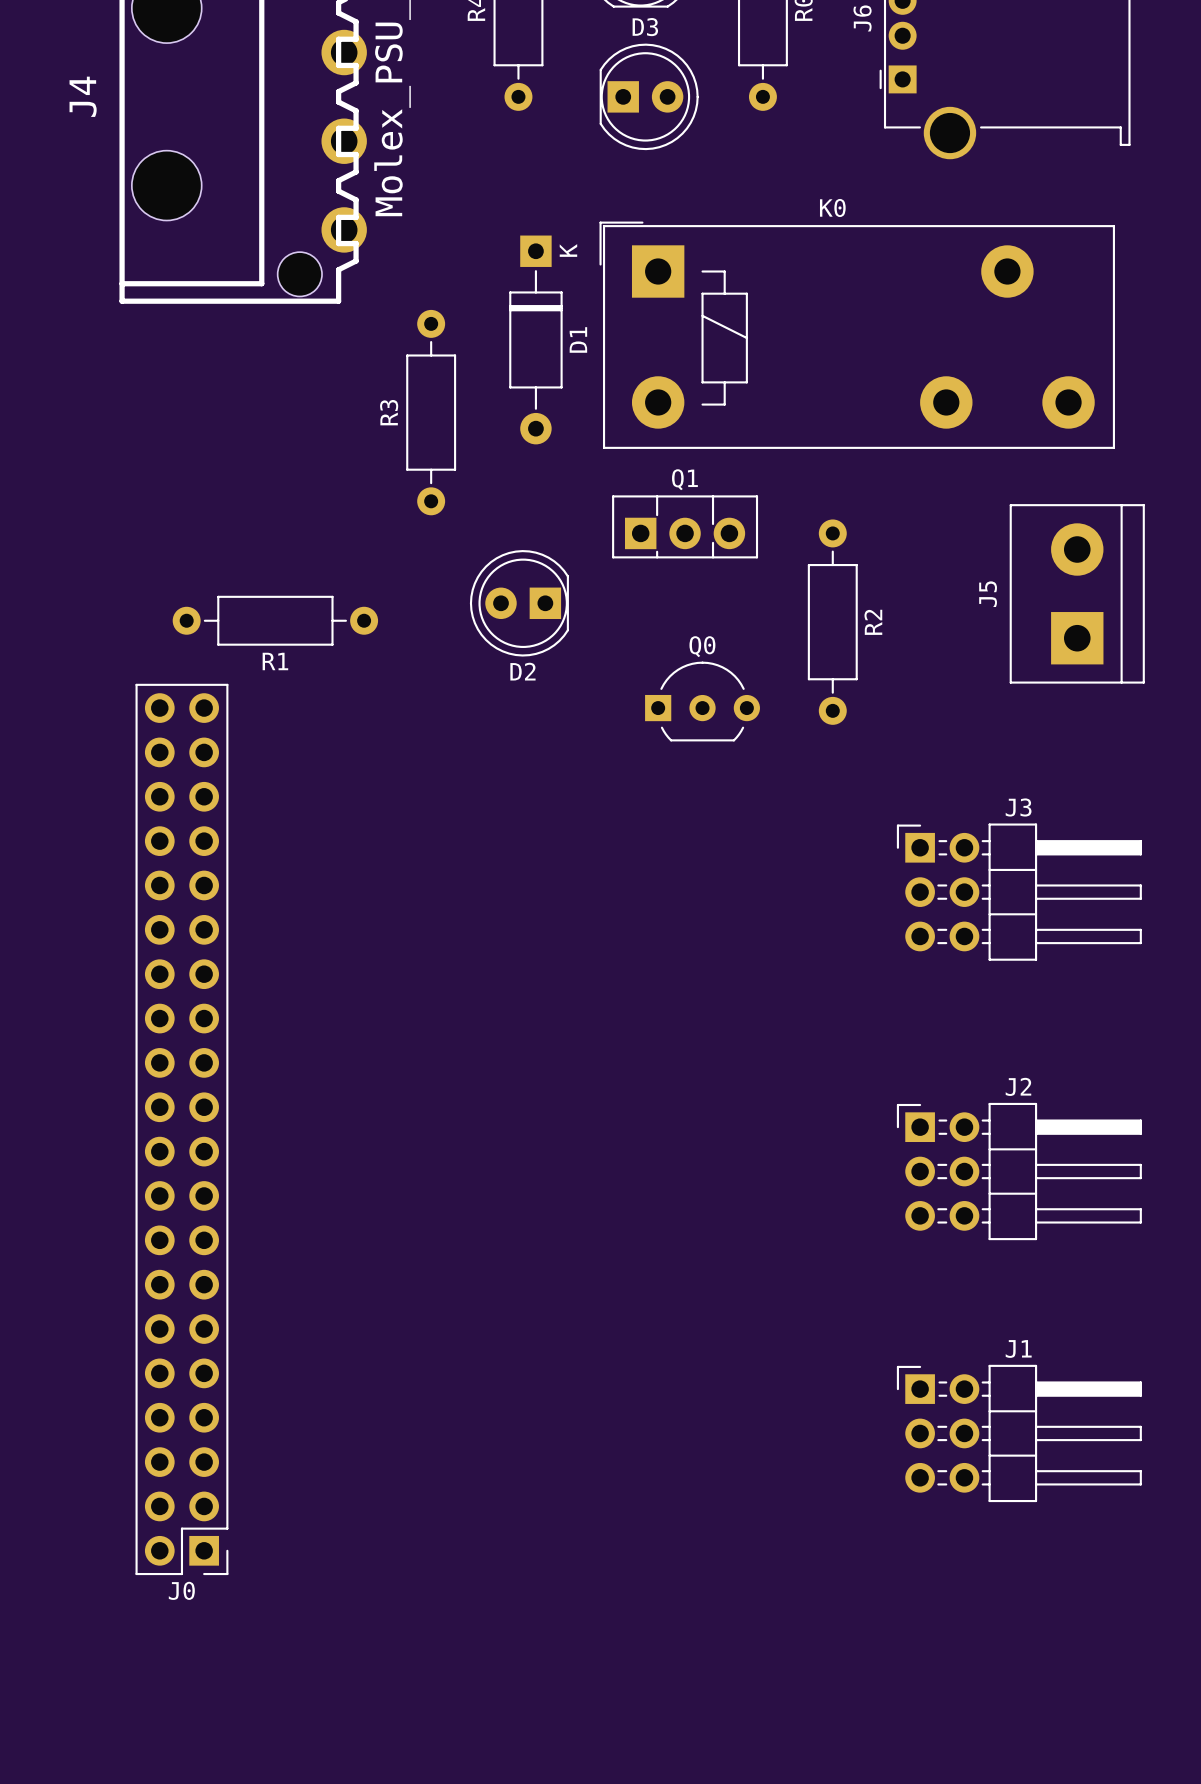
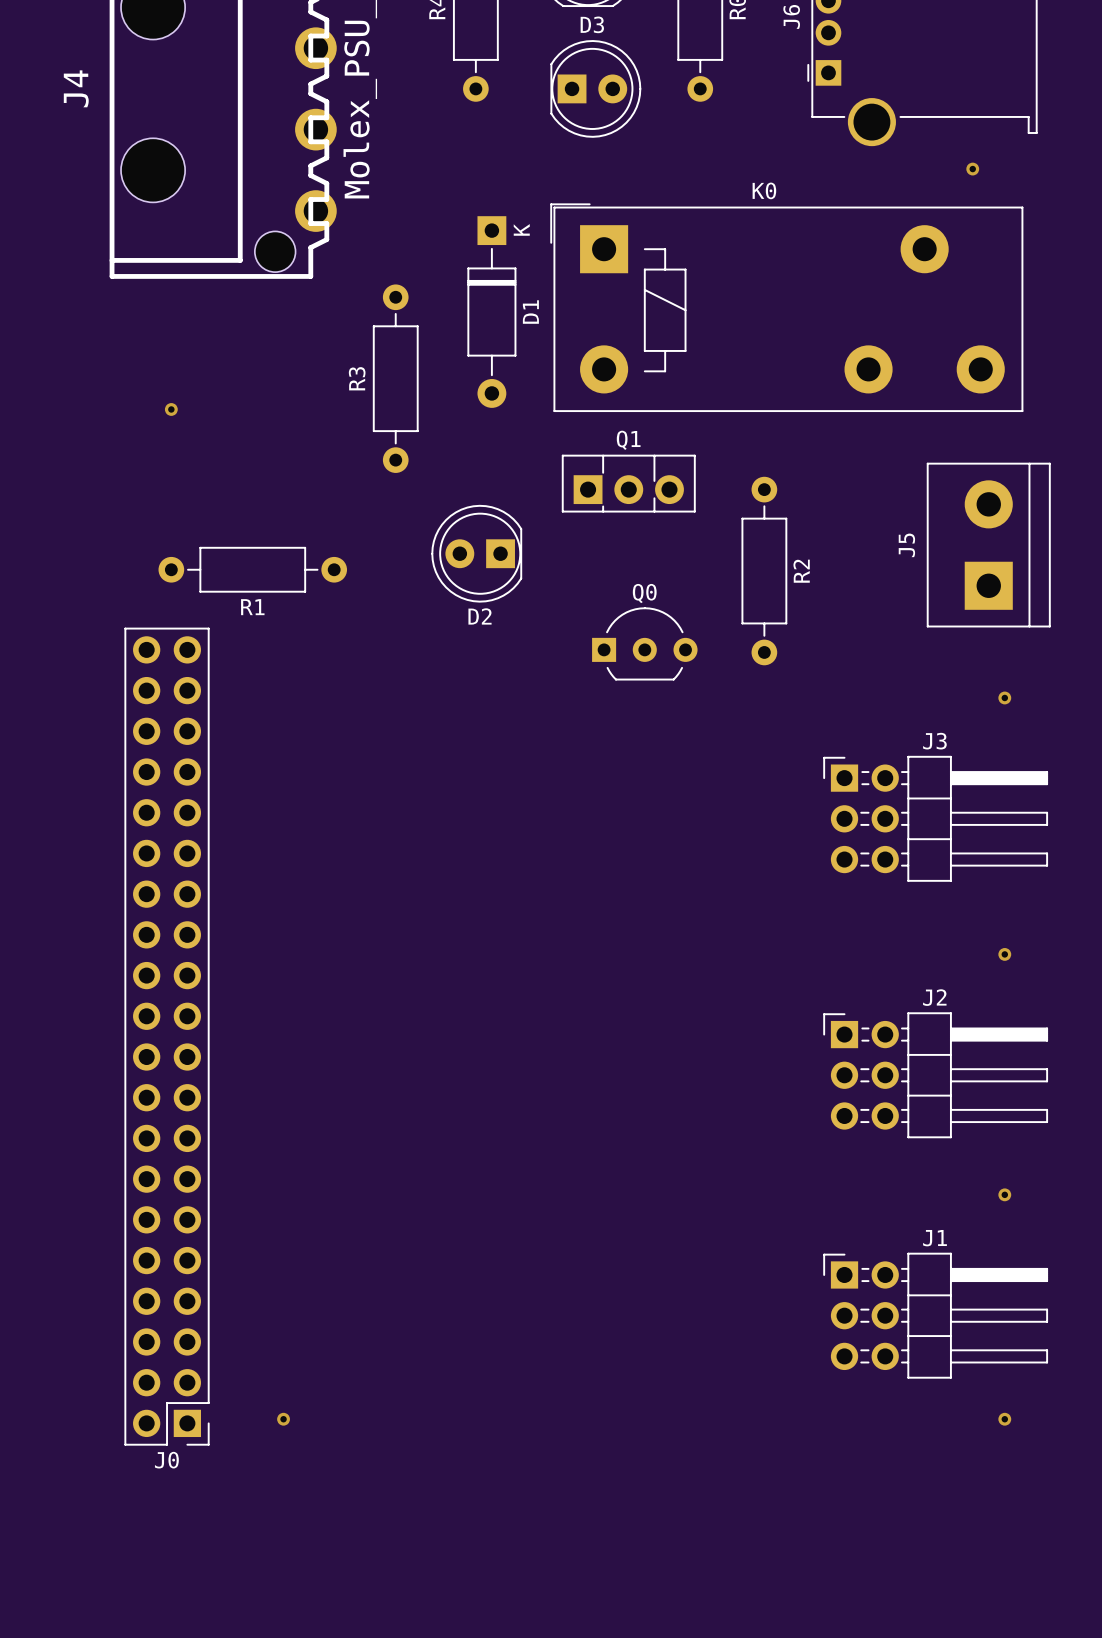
via: none -> (972, 169)
via: none -> (171, 409)
via: none -> (1004, 697)
via: none -> (1004, 954)
via: none -> (1004, 1194)
via: none -> (283, 1419)
via: none -> (1004, 1419)

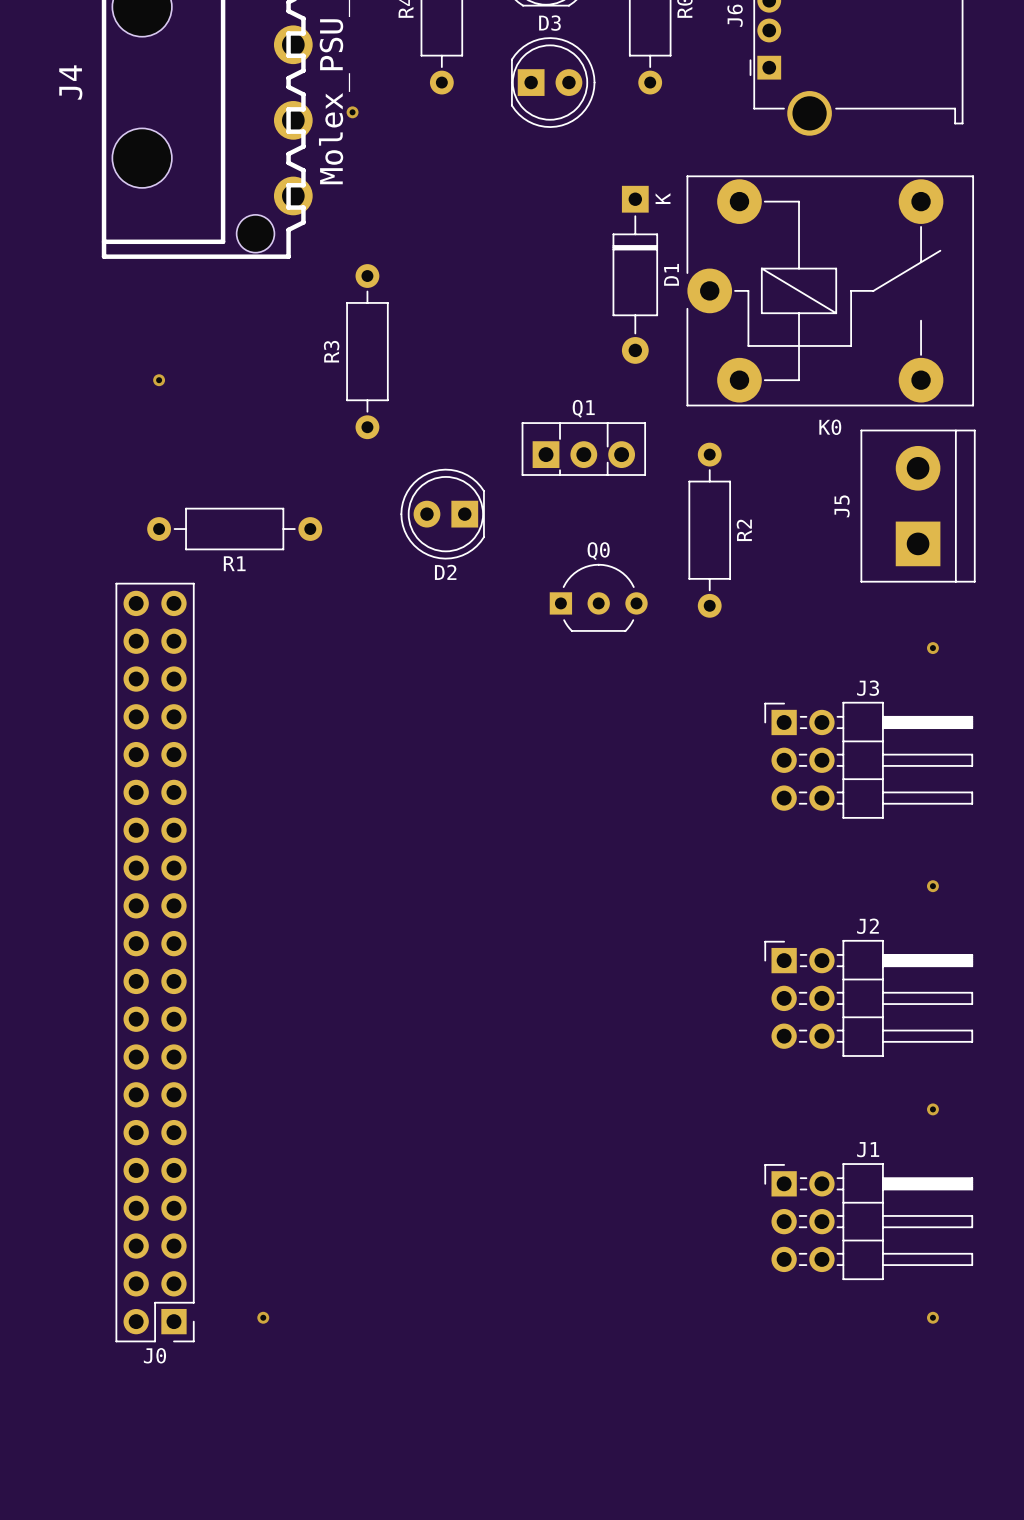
via: none -> (352, 112)
via: (972, 169) -> none
K0 name position: K0 (764, 190) -> K0 (830, 427)
K0 footprint: [550, 203, 1024, 413] -> [686, 175, 975, 407]
D1 position: (491, 312) -> (635, 274)

